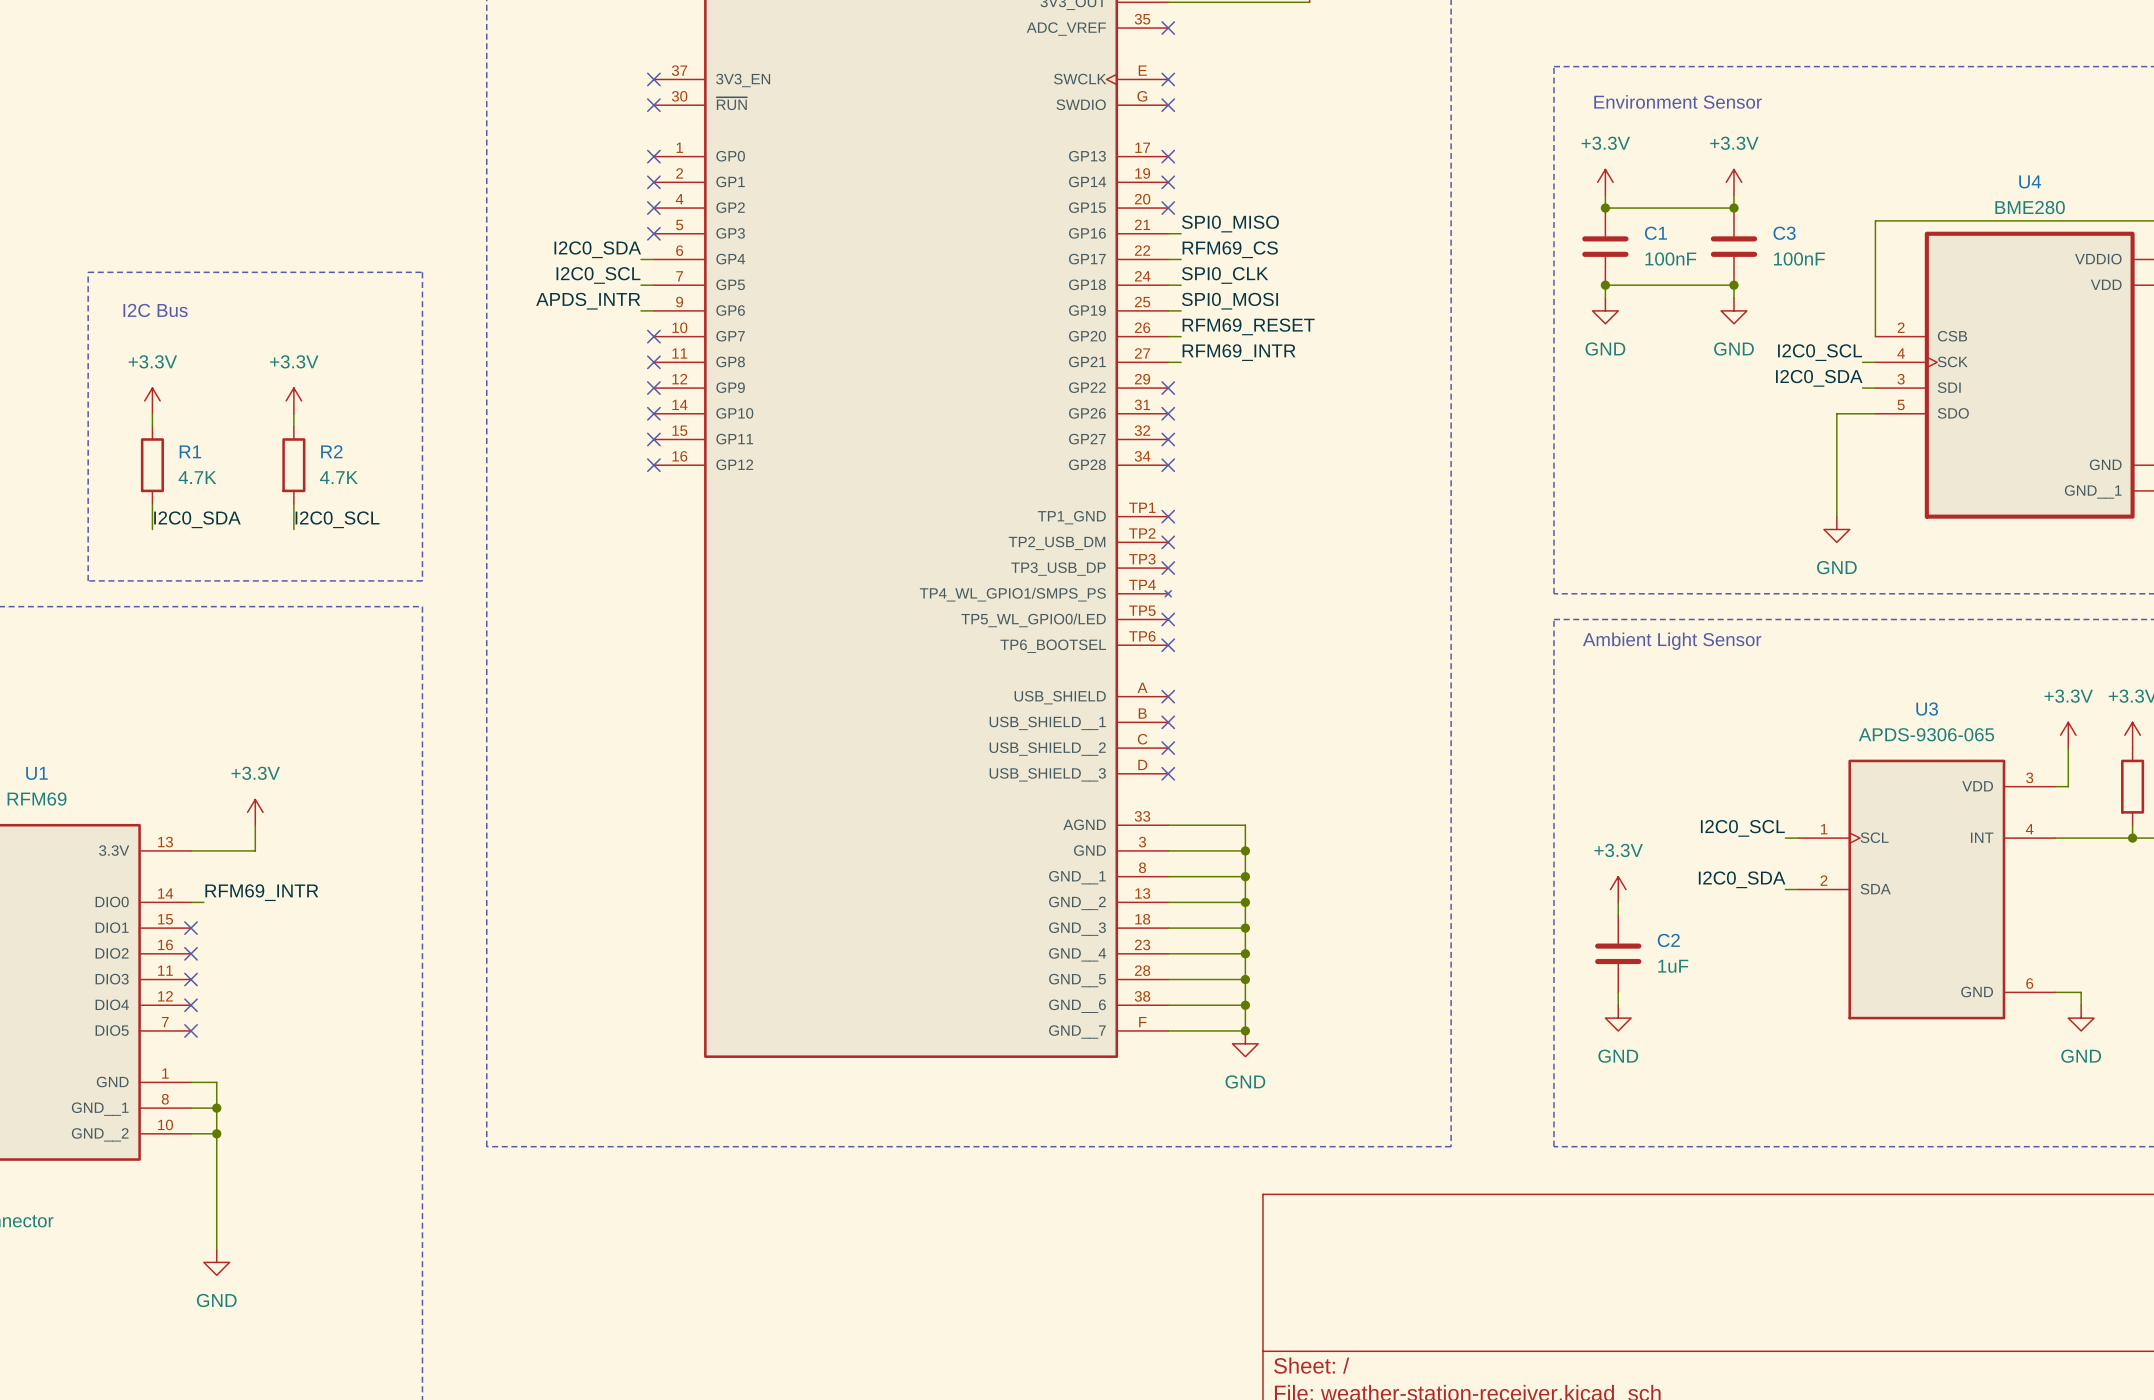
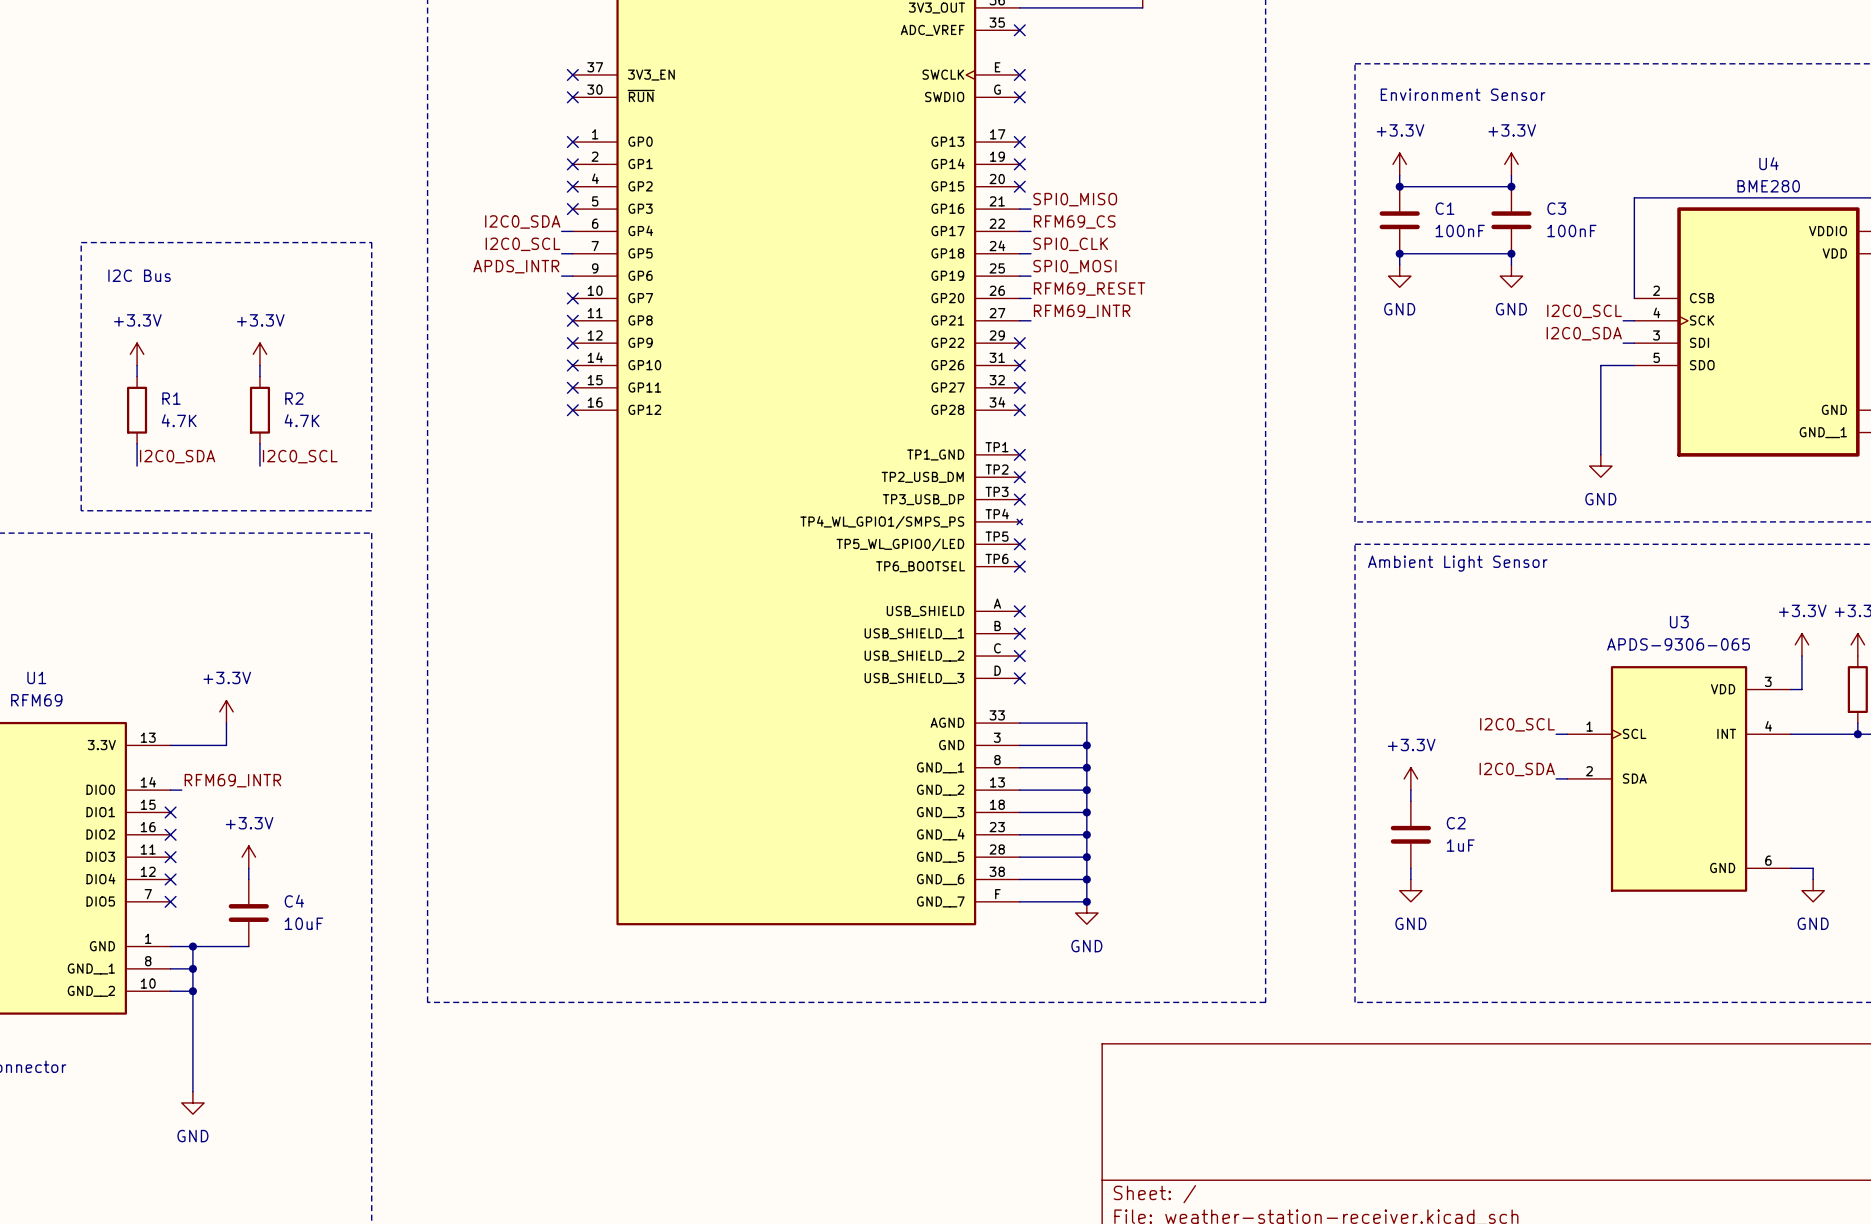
power symbol: none -> +3.3V (248, 857)
wire: none -> (248, 868) (248, 879)
C4: none -> 10uF (248, 913)
wire: none -> (192, 946) (248, 946)
junction: none -> (192, 946)

